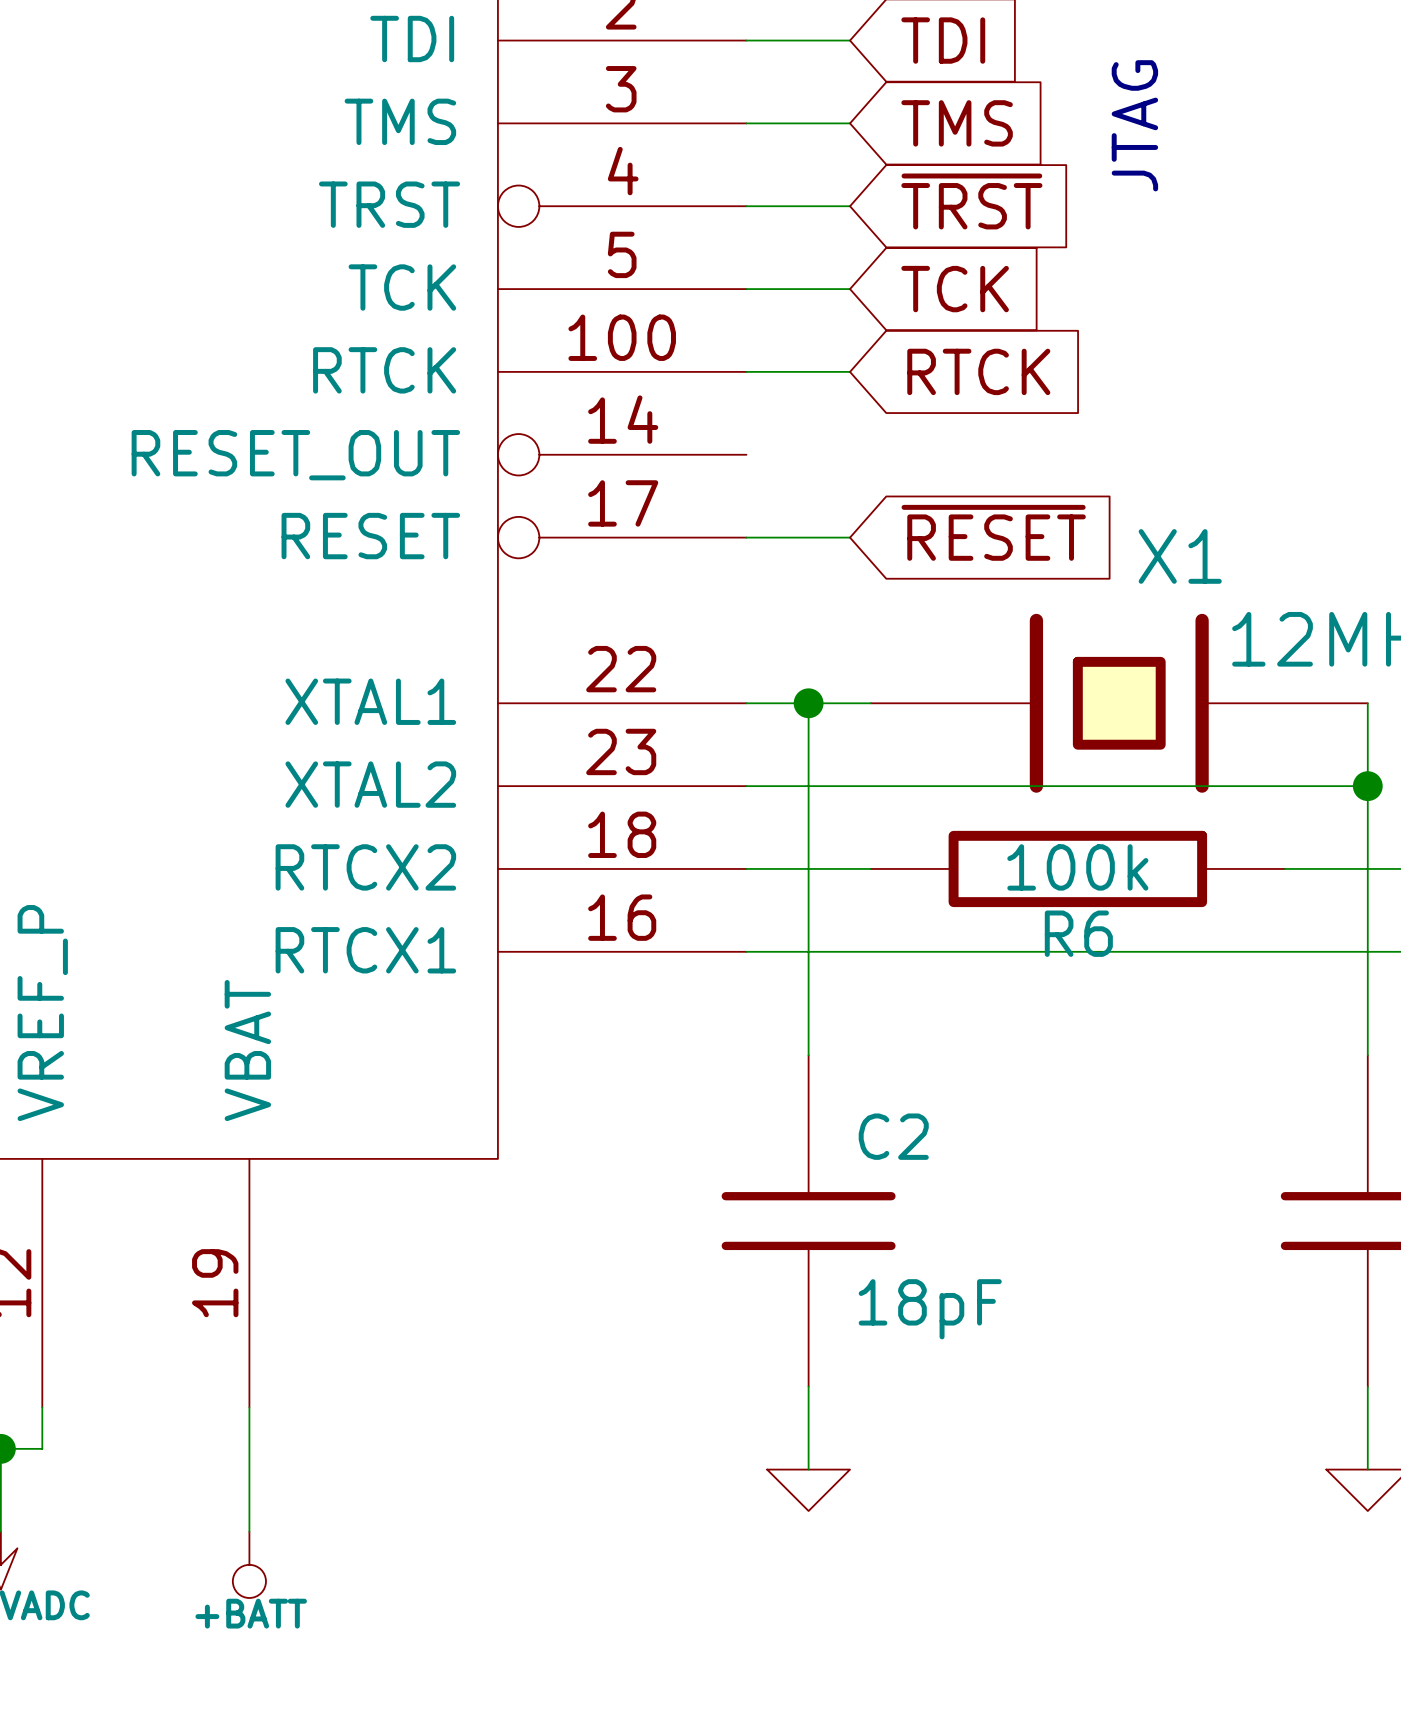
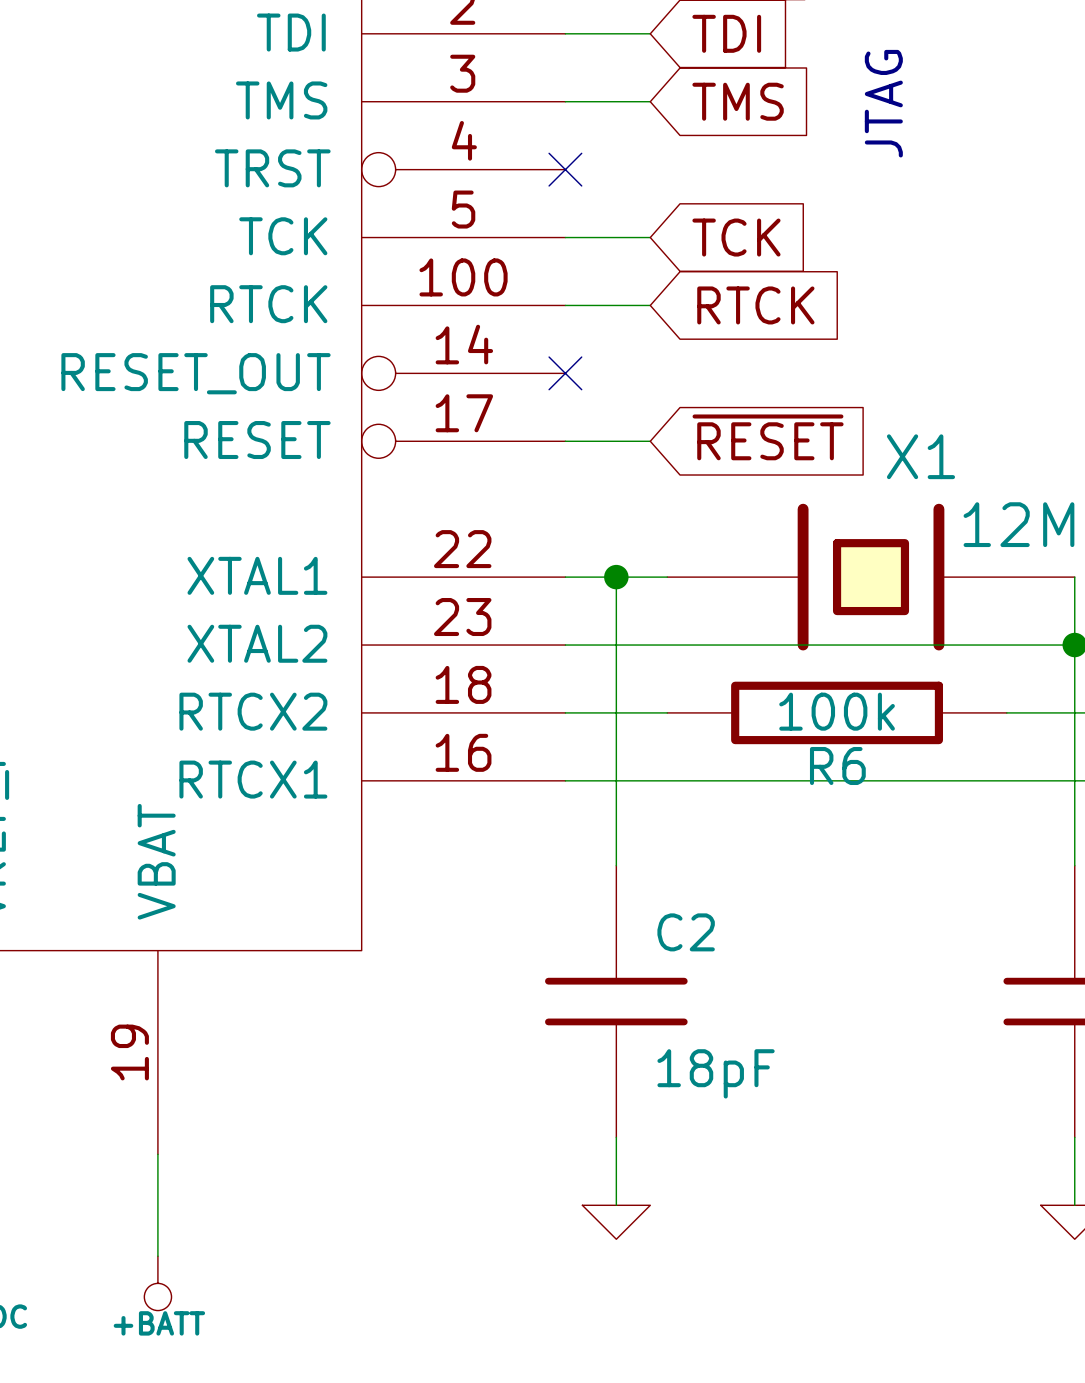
global label: ~{TRST} (971, 201) -> none
wire: (746, 206) (850, 206) -> none
no-connect mark: none -> (565, 169)
no-connect mark: none -> (565, 373)

